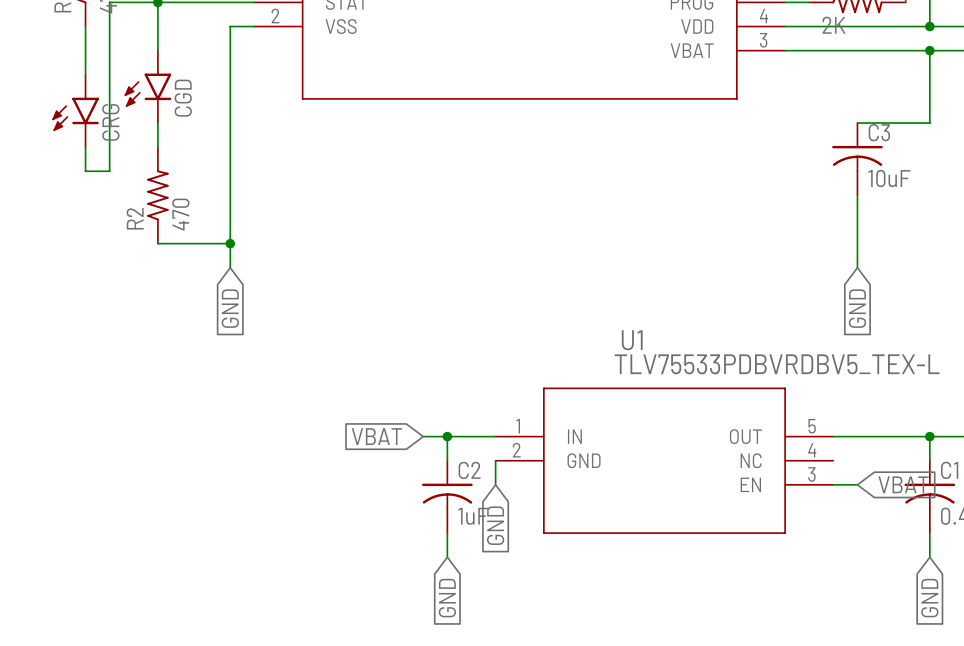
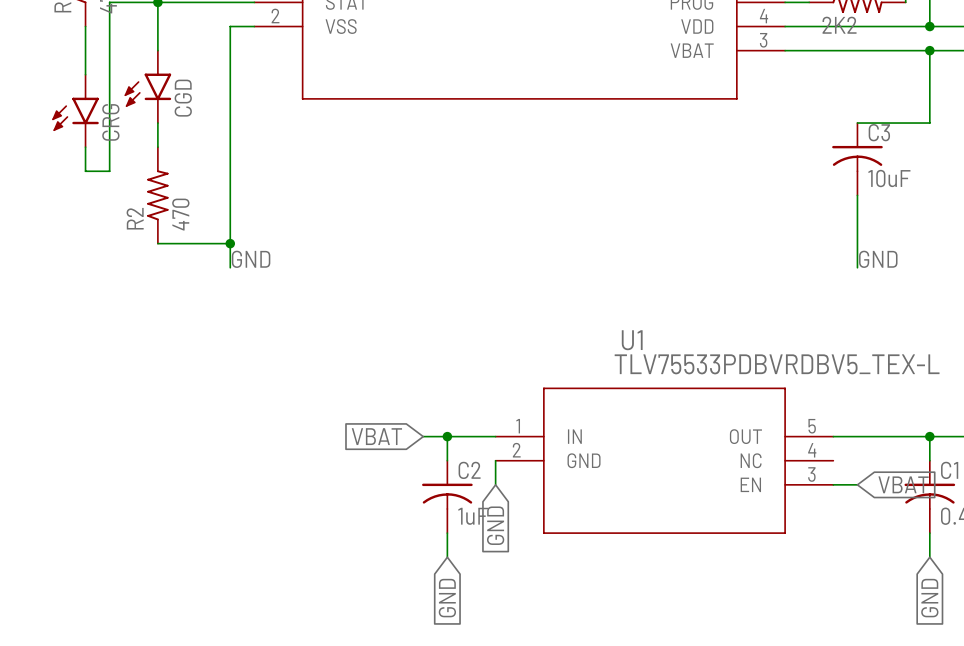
part value: 2K (834, 25) -> 2K2 (839, 25)
label: none -> GND (251, 259)
label: none -> GND (878, 259)
global label: GND (230, 308) -> none
global label: GND (857, 308) -> none

